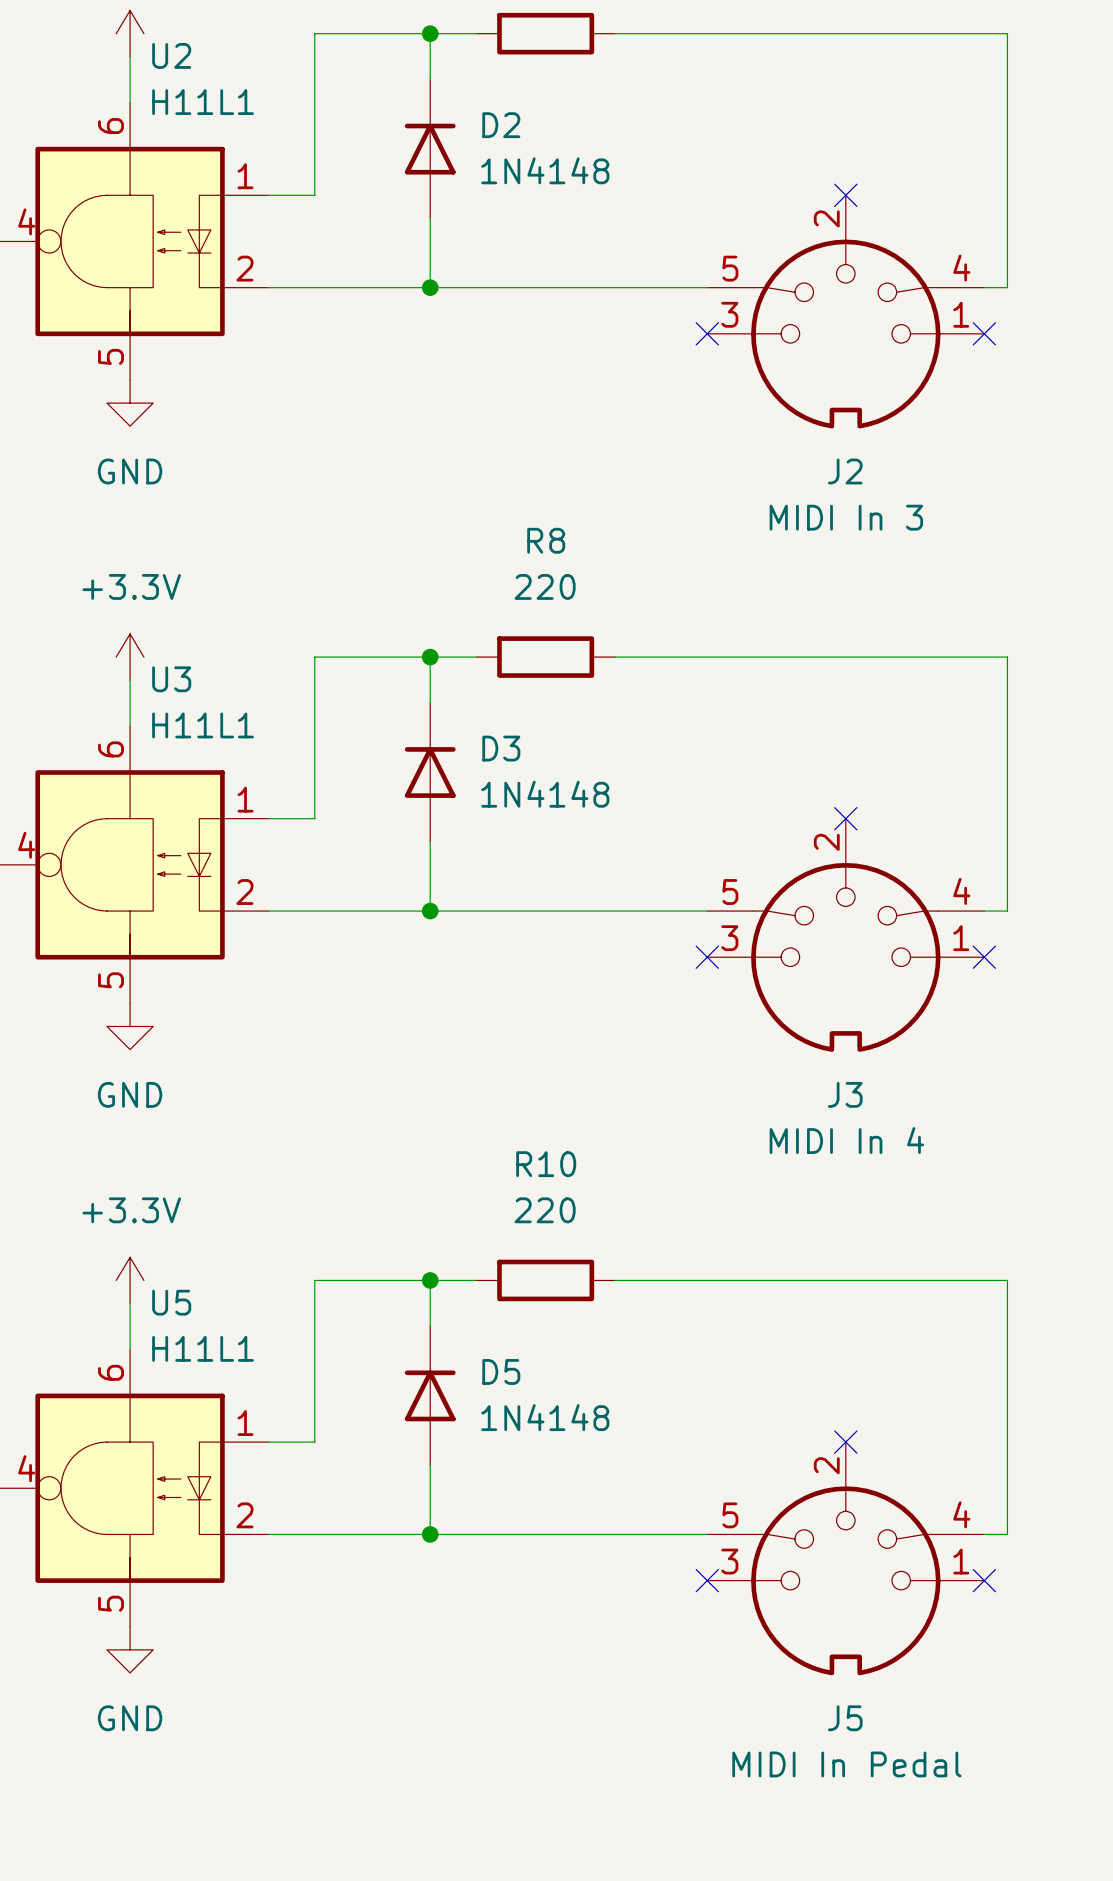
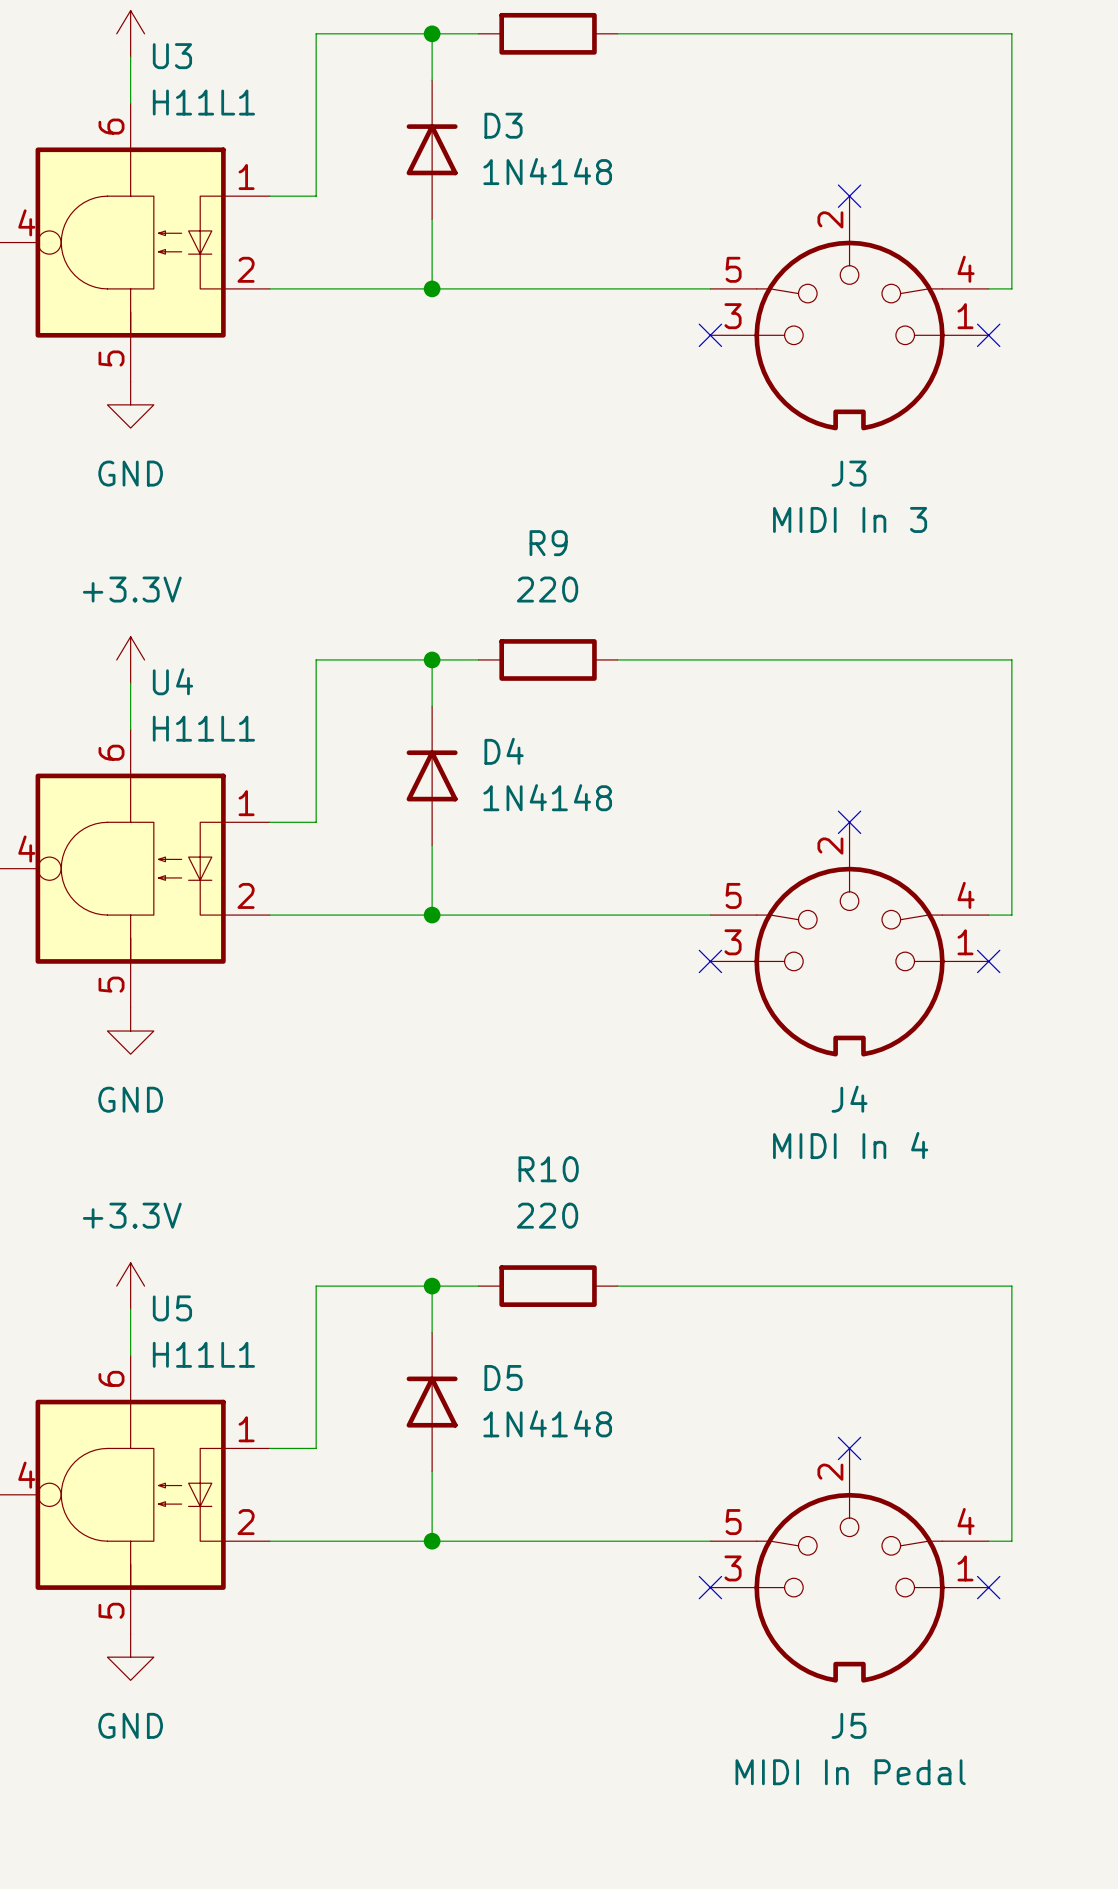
U2 name: U2 (171, 55) -> U3 (172, 56)
D2 name: D2 (501, 125) -> D3 (503, 125)
J2 name: J2 (845, 471) -> J3 (848, 473)
R8 name: R8 (546, 540) -> R9 (548, 543)
U3 name: U3 (171, 679) -> U4 (173, 681)
D3 name: D3 (501, 748) -> D4 (504, 751)
J3 name: J3 (845, 1094) -> J4 (849, 1099)

